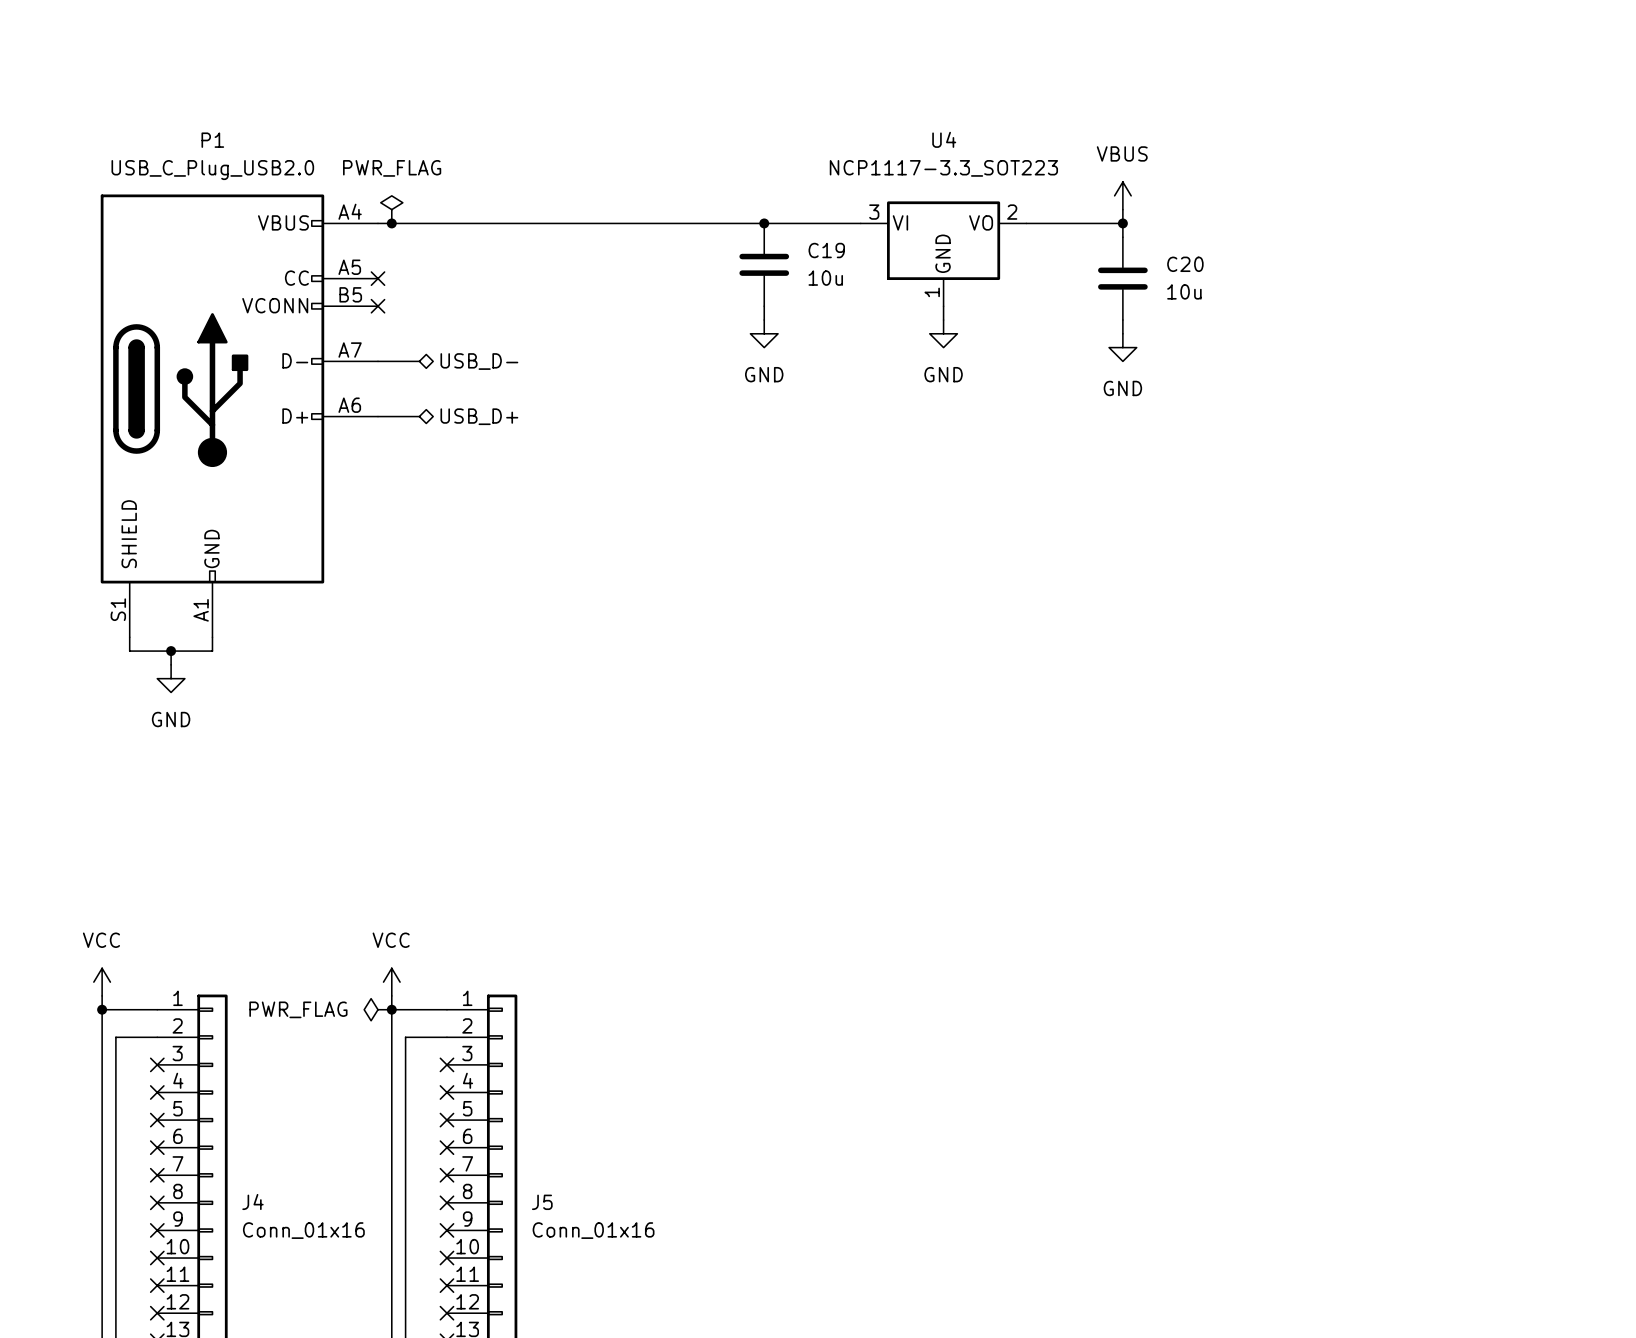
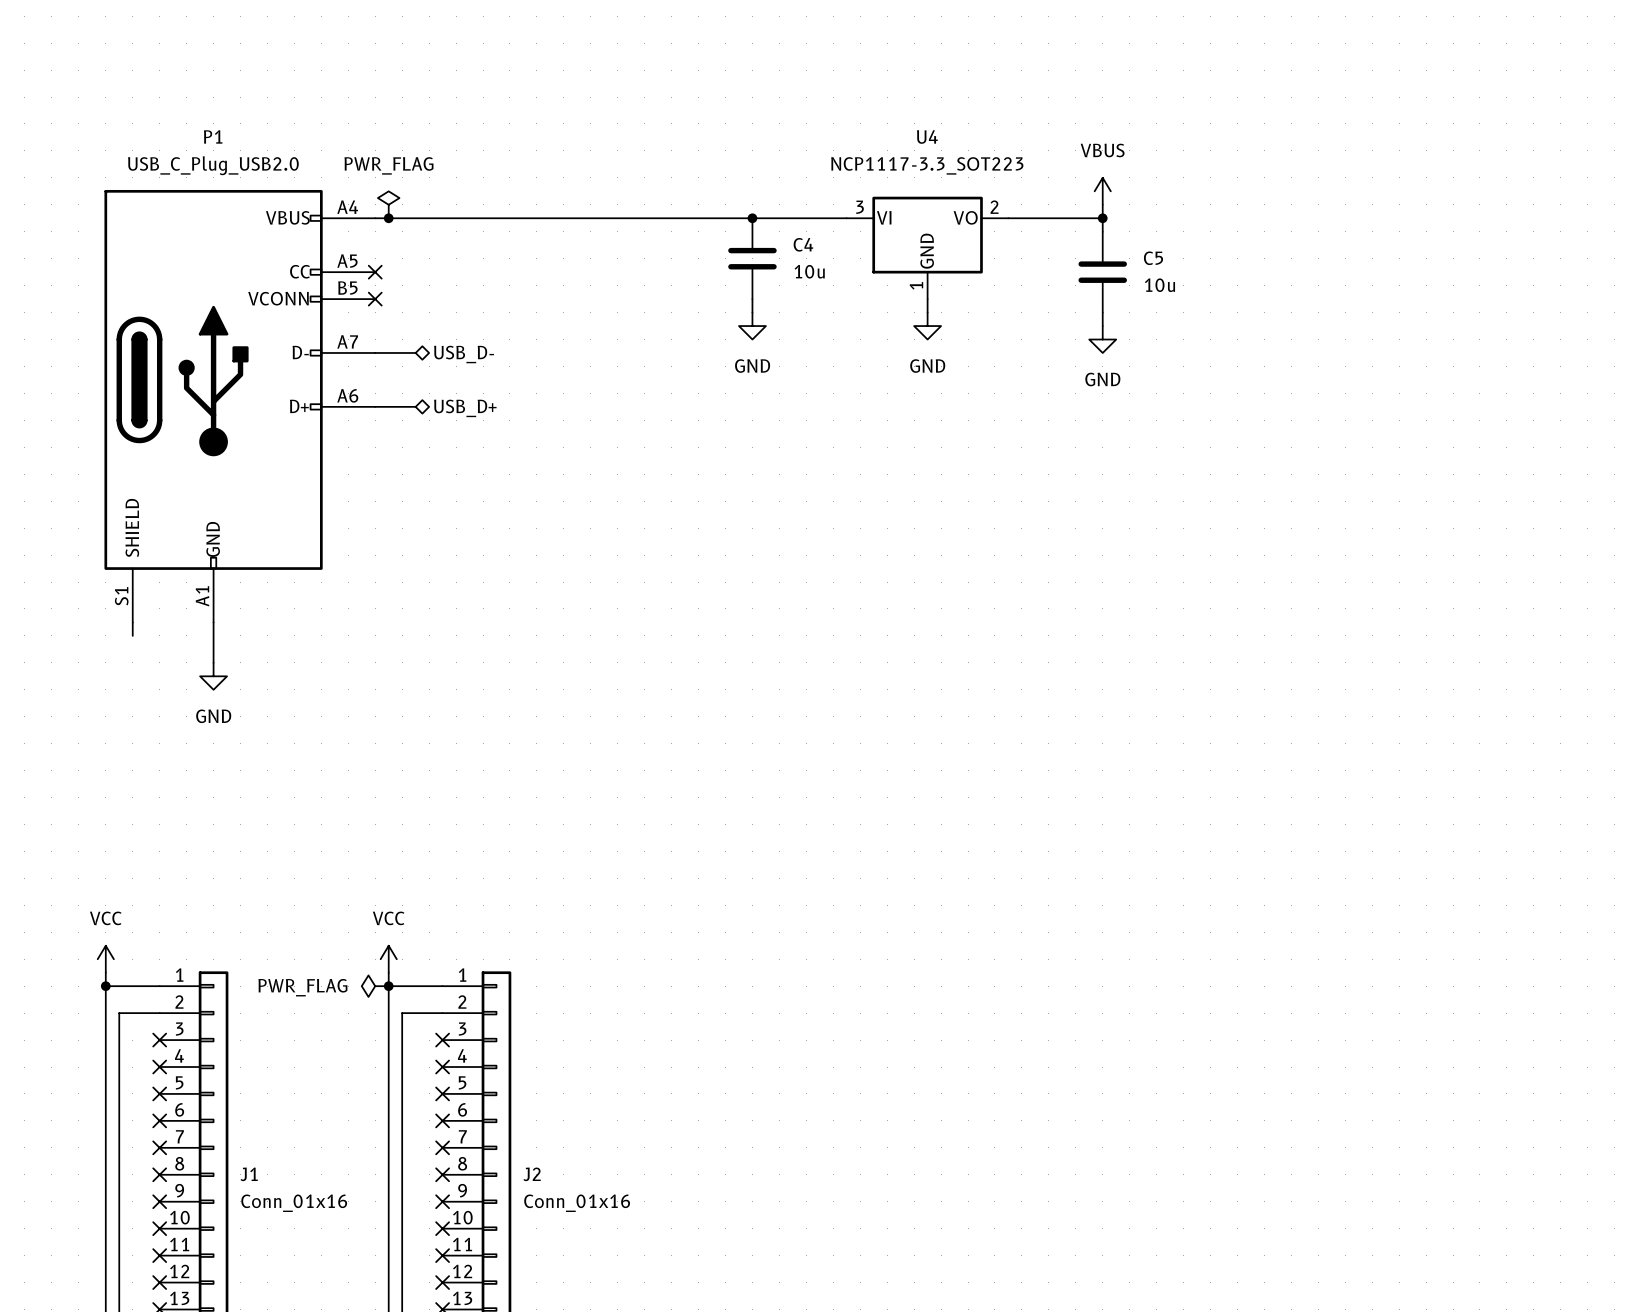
C19 name: C19 (826, 250) -> C4 (803, 244)
C20 name: C20 (1185, 264) -> C5 (1153, 258)
wire: (129, 651) (212, 651) -> (213, 662) (213, 635)
wire: (171, 651) (171, 664) -> none
junction: (171, 651) -> none
power symbol position: GND (171, 678) -> GND (213, 676)
J4 name: J4 (252, 1202) -> J1 (249, 1174)
J5 name: J5 (542, 1202) -> J2 (532, 1174)

